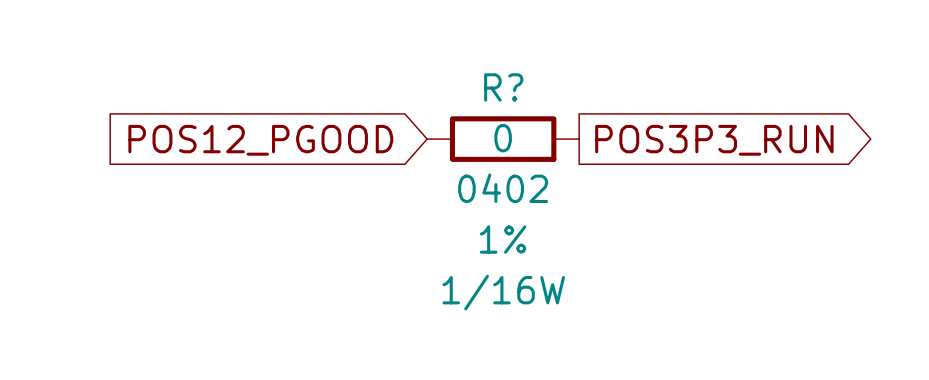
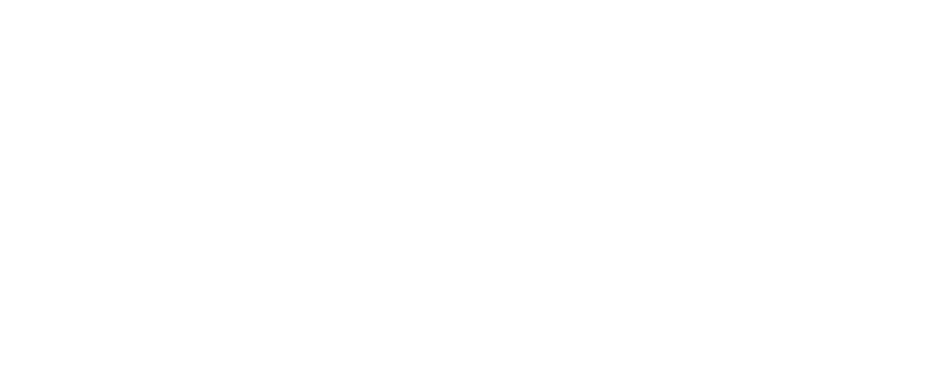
R?: 0 (503, 139) -> none
global label: POS12_PGOOD (260, 140) -> none
global label: POS3P3_RUN (714, 140) -> none

